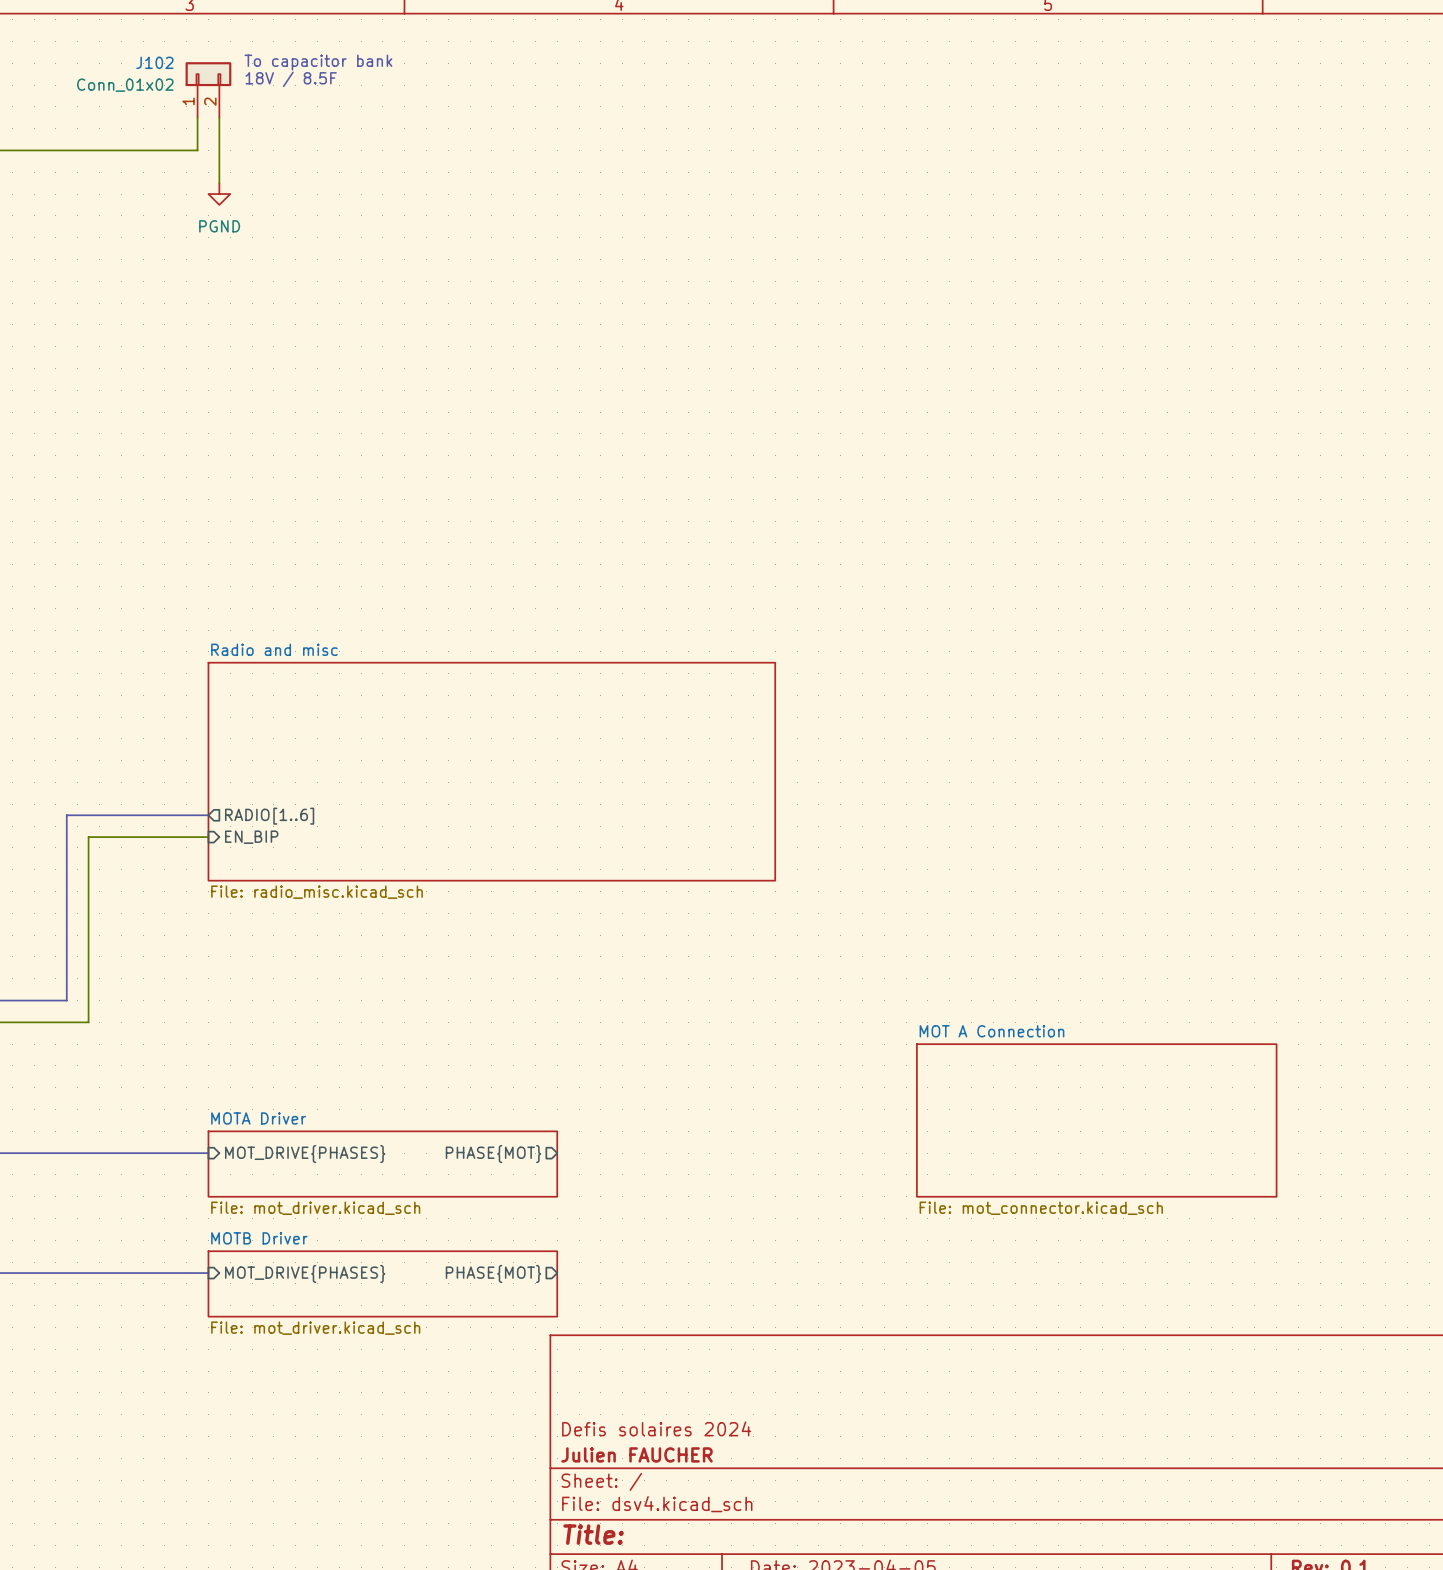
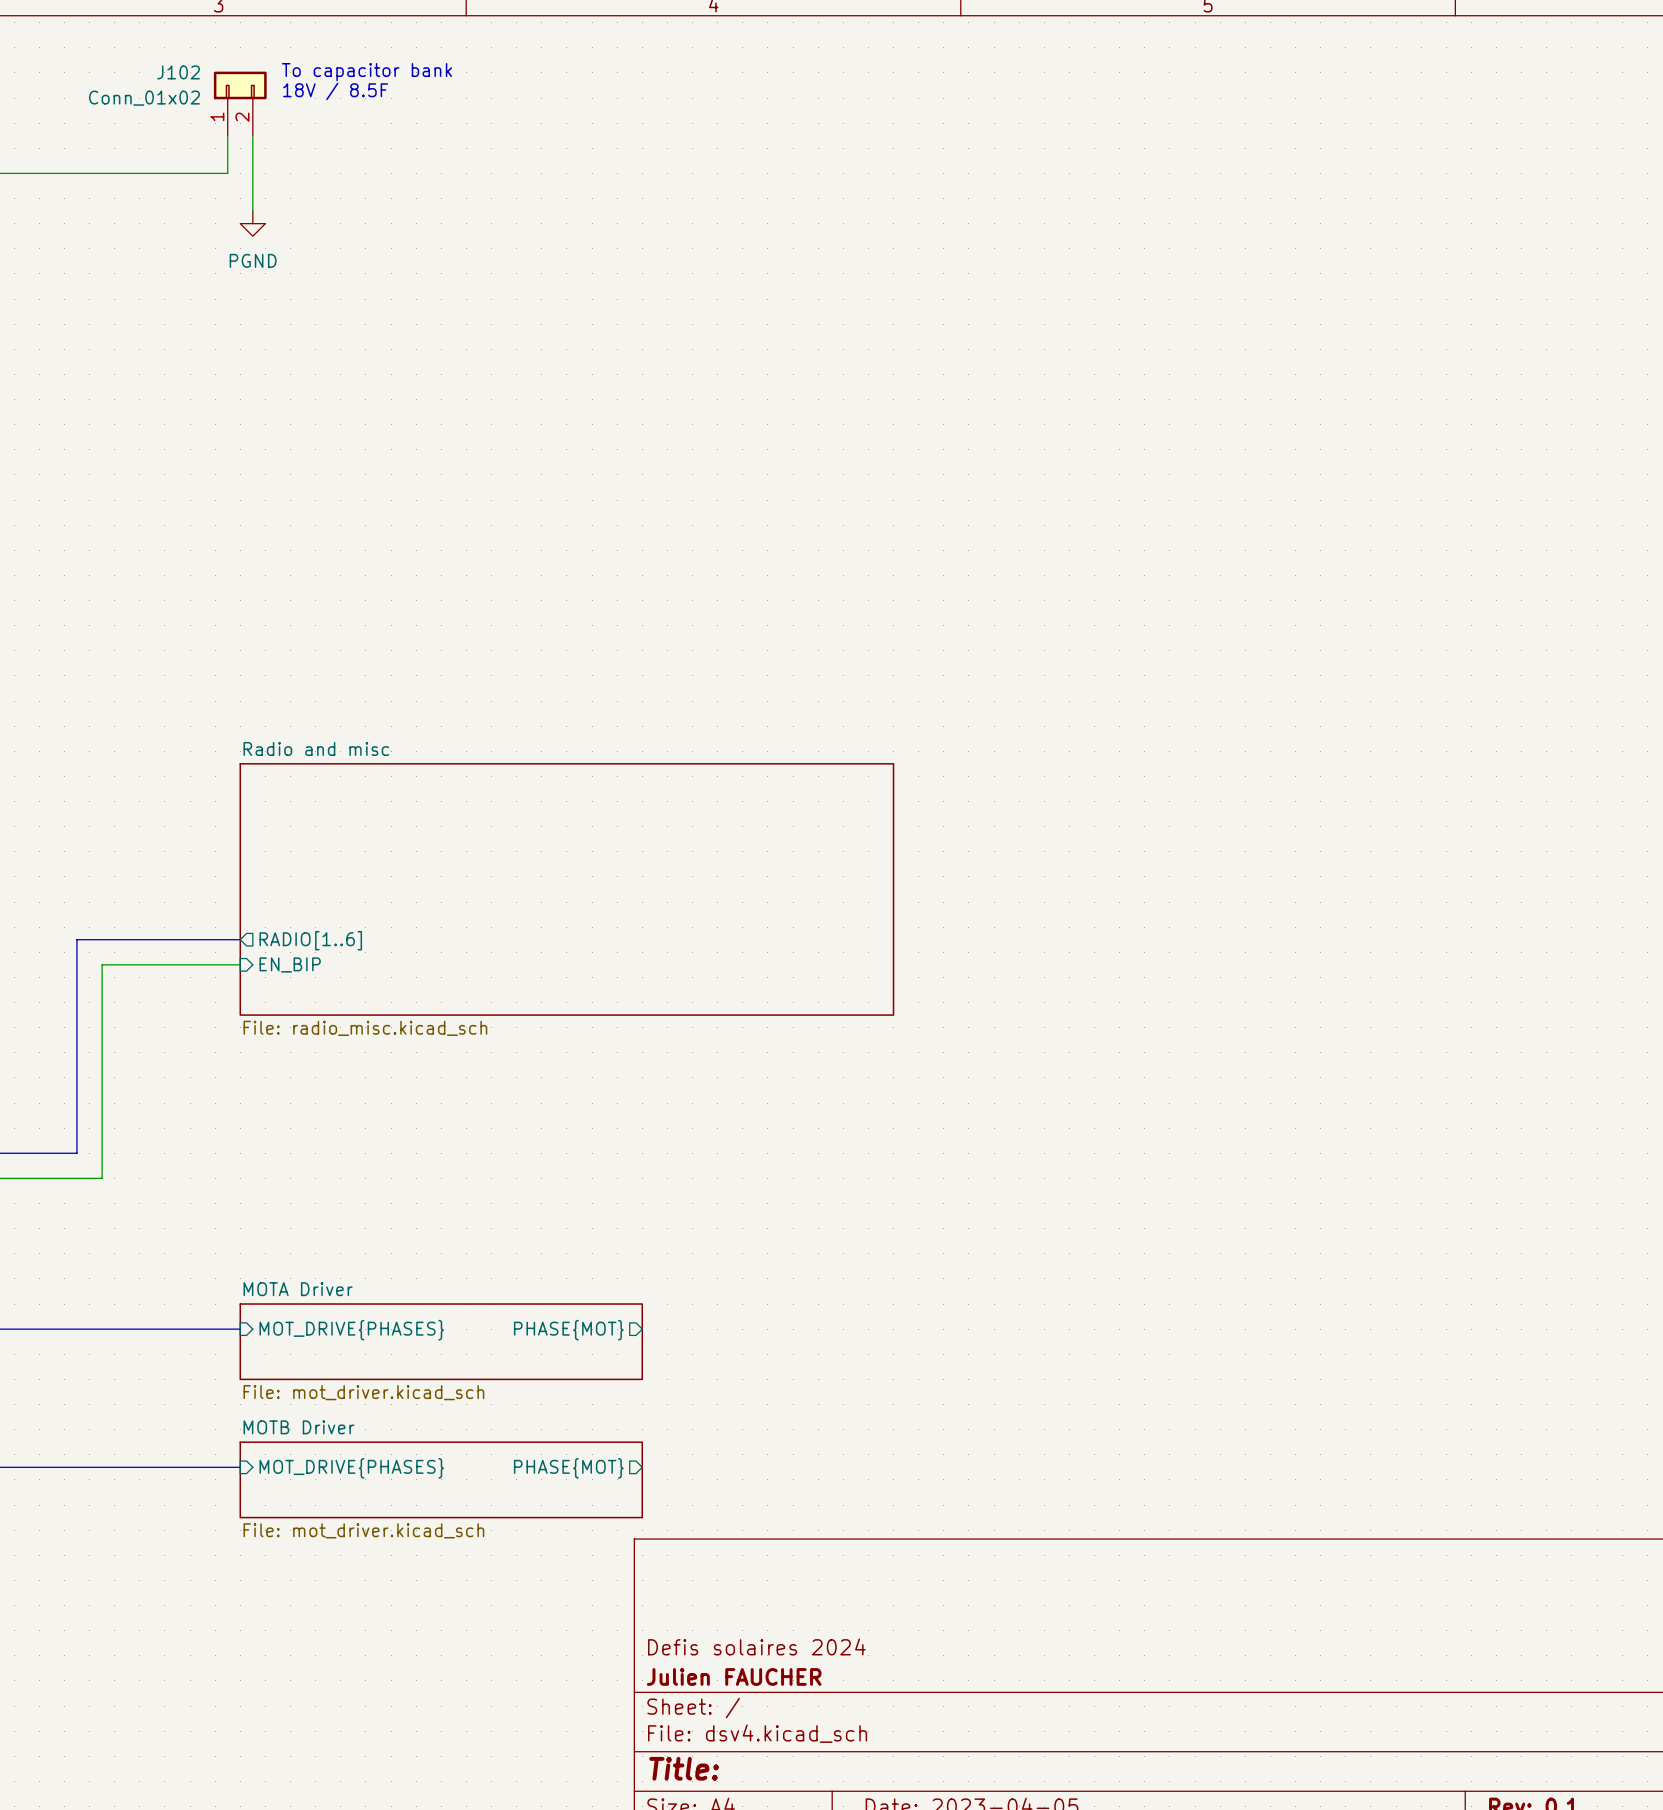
sheet MOT A Connection: File: mot_connector.kicad_sch (1096, 1120) -> none

